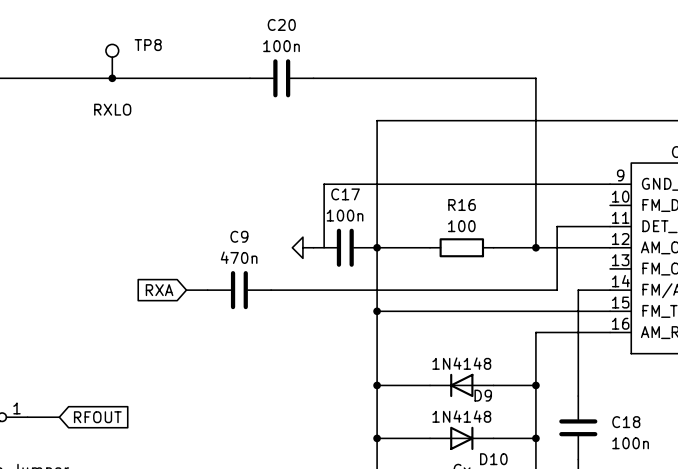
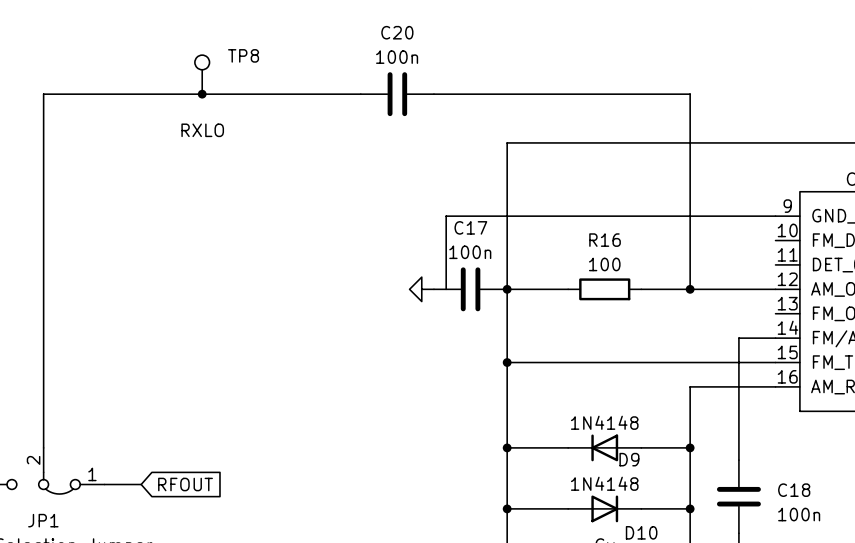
wire: (610, 226) (557, 226) (557, 290) (271, 290) -> none
global label: RXA (159, 290) -> none
wire: (186, 290) (207, 290) -> none
C9: 470n (239, 290) -> none

